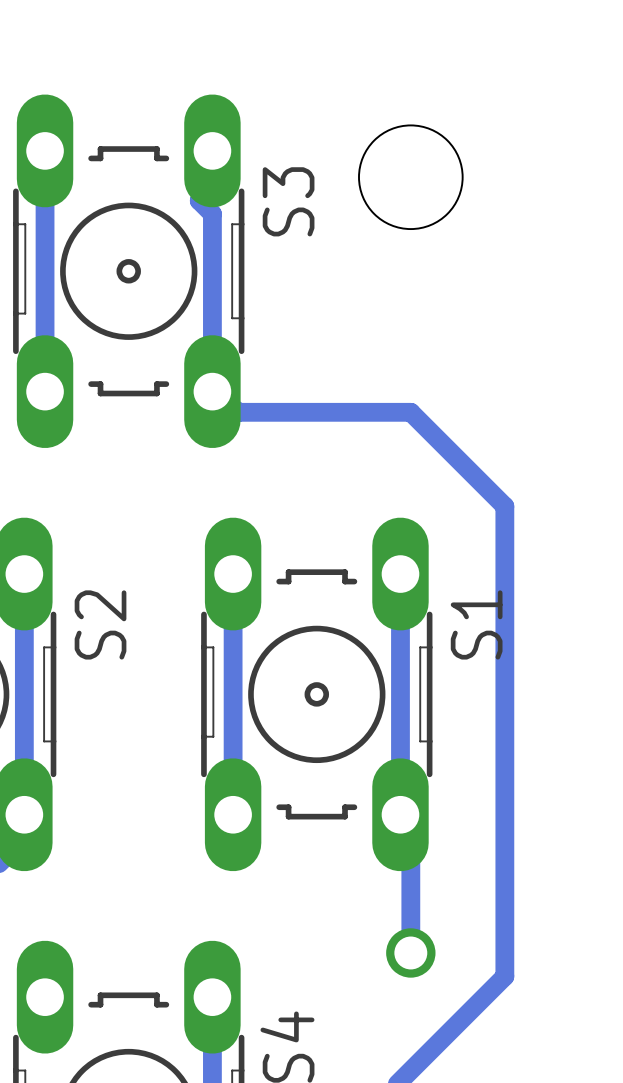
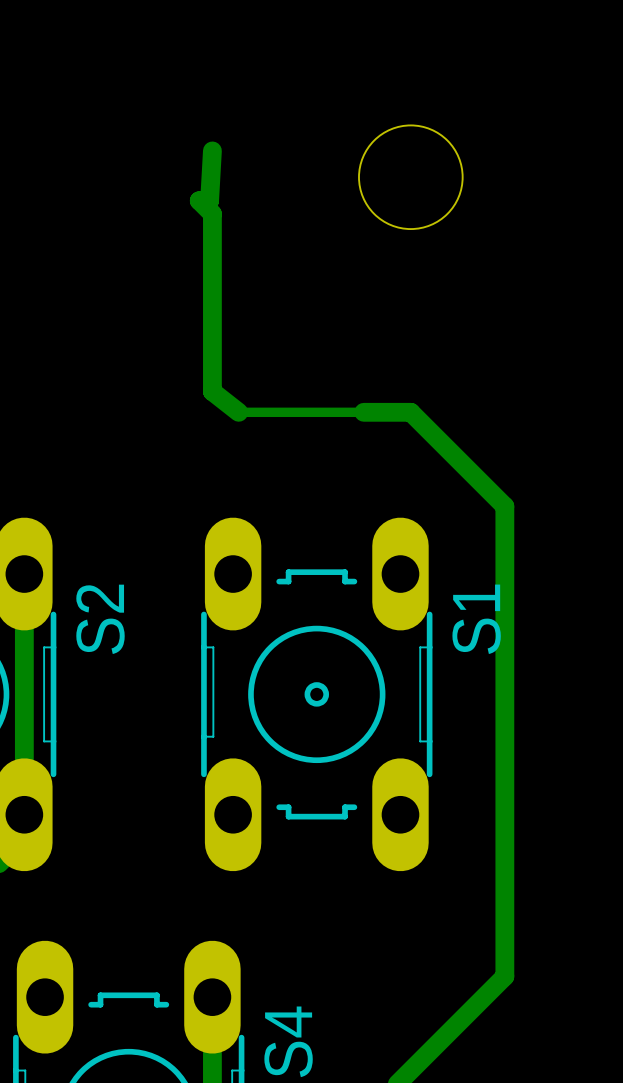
track: (45, 150) (45, 391) -> none
S3: (128, 271) -> none
track width: thick (363, 412) (238, 412) -> thin (363, 412) (238, 412)
track: (233, 574) (233, 814) -> none
track: (400, 574) (400, 814) (410, 825) (410, 952) -> none
via: (410, 952) -> none

